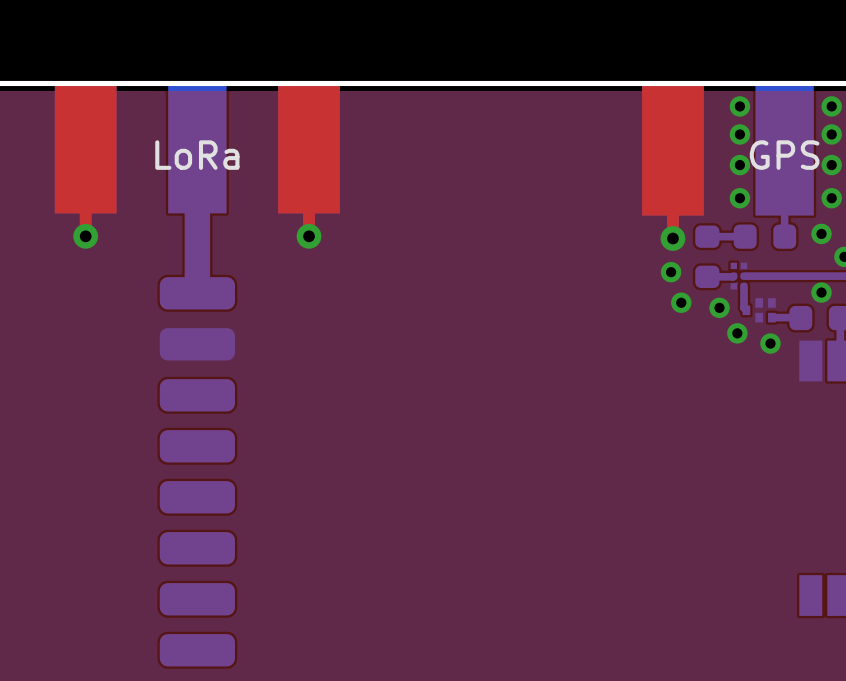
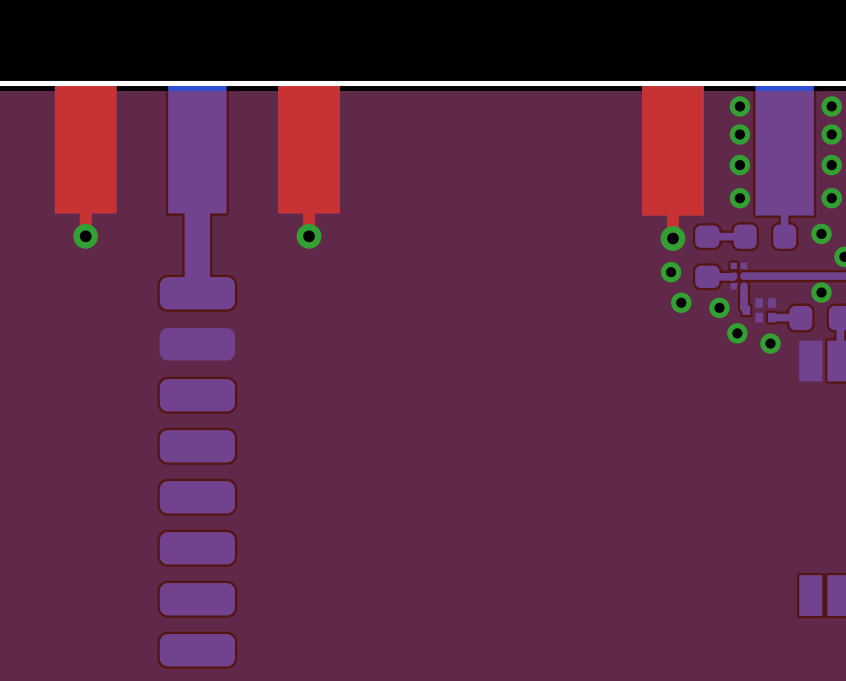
text: LoRa (197, 155) -> none
text: GPS (784, 155) -> none

